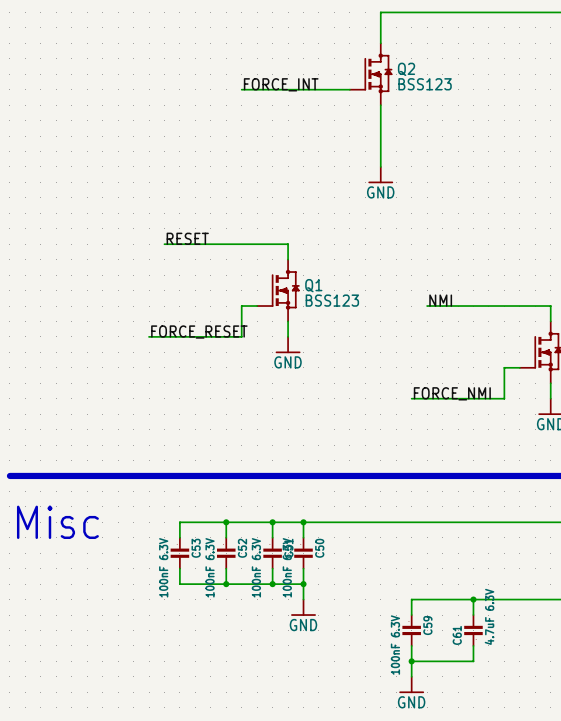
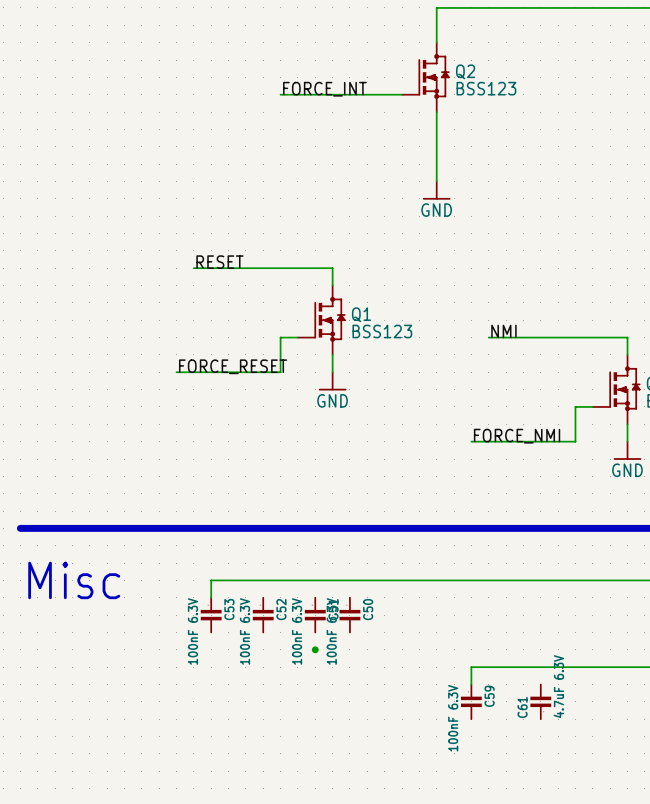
wire: (226, 522) (226, 537) -> none
junction: (226, 522) -> none
wire: (272, 522) (272, 537) -> none
junction: (272, 522) -> none
wire: (303, 522) (303, 537) -> none
junction: (303, 522) -> none
wire: (179, 568) (179, 584) (303, 584) -> none
wire: (226, 568) (226, 584) -> none
wire: (272, 568) (272, 584) -> none
wire: (303, 568) (303, 599) -> none
junction: (226, 584) -> none
junction: (303, 584) -> none
wire: (473, 599) (473, 615) -> none
junction: (473, 599) -> none
power symbol: GND (303, 607) -> none
wire: (411, 645) (411, 676) -> none
wire: (473, 645) (473, 661) (411, 661) -> none
junction: (411, 661) -> none
power symbol: GND (411, 684) -> none

